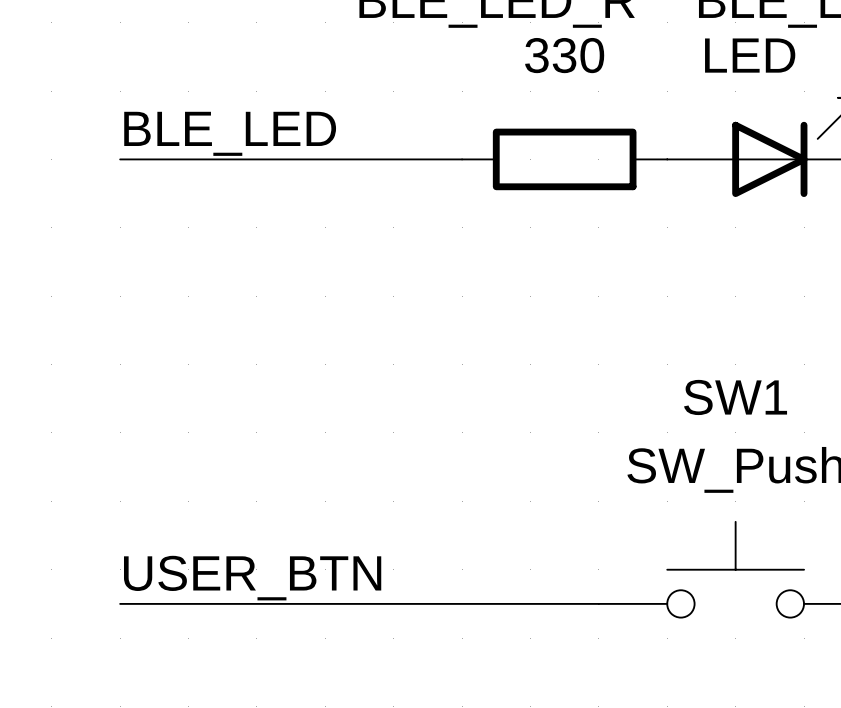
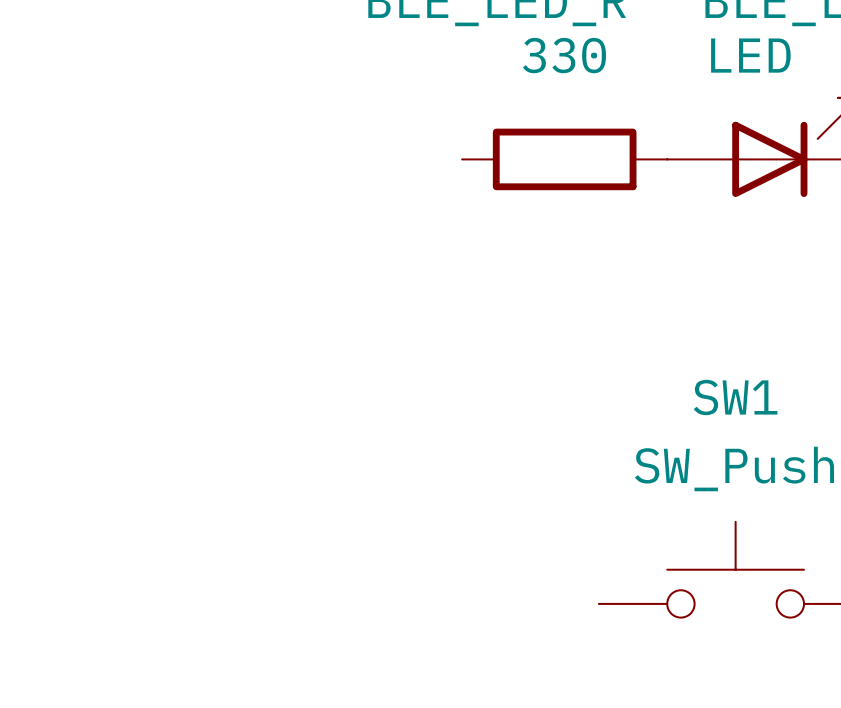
label: BLE_LED (230, 133) -> none
wire: (120, 159) (462, 159) -> none
label: USER_BTN (252, 578) -> none
wire: (120, 603) (598, 603) -> none

